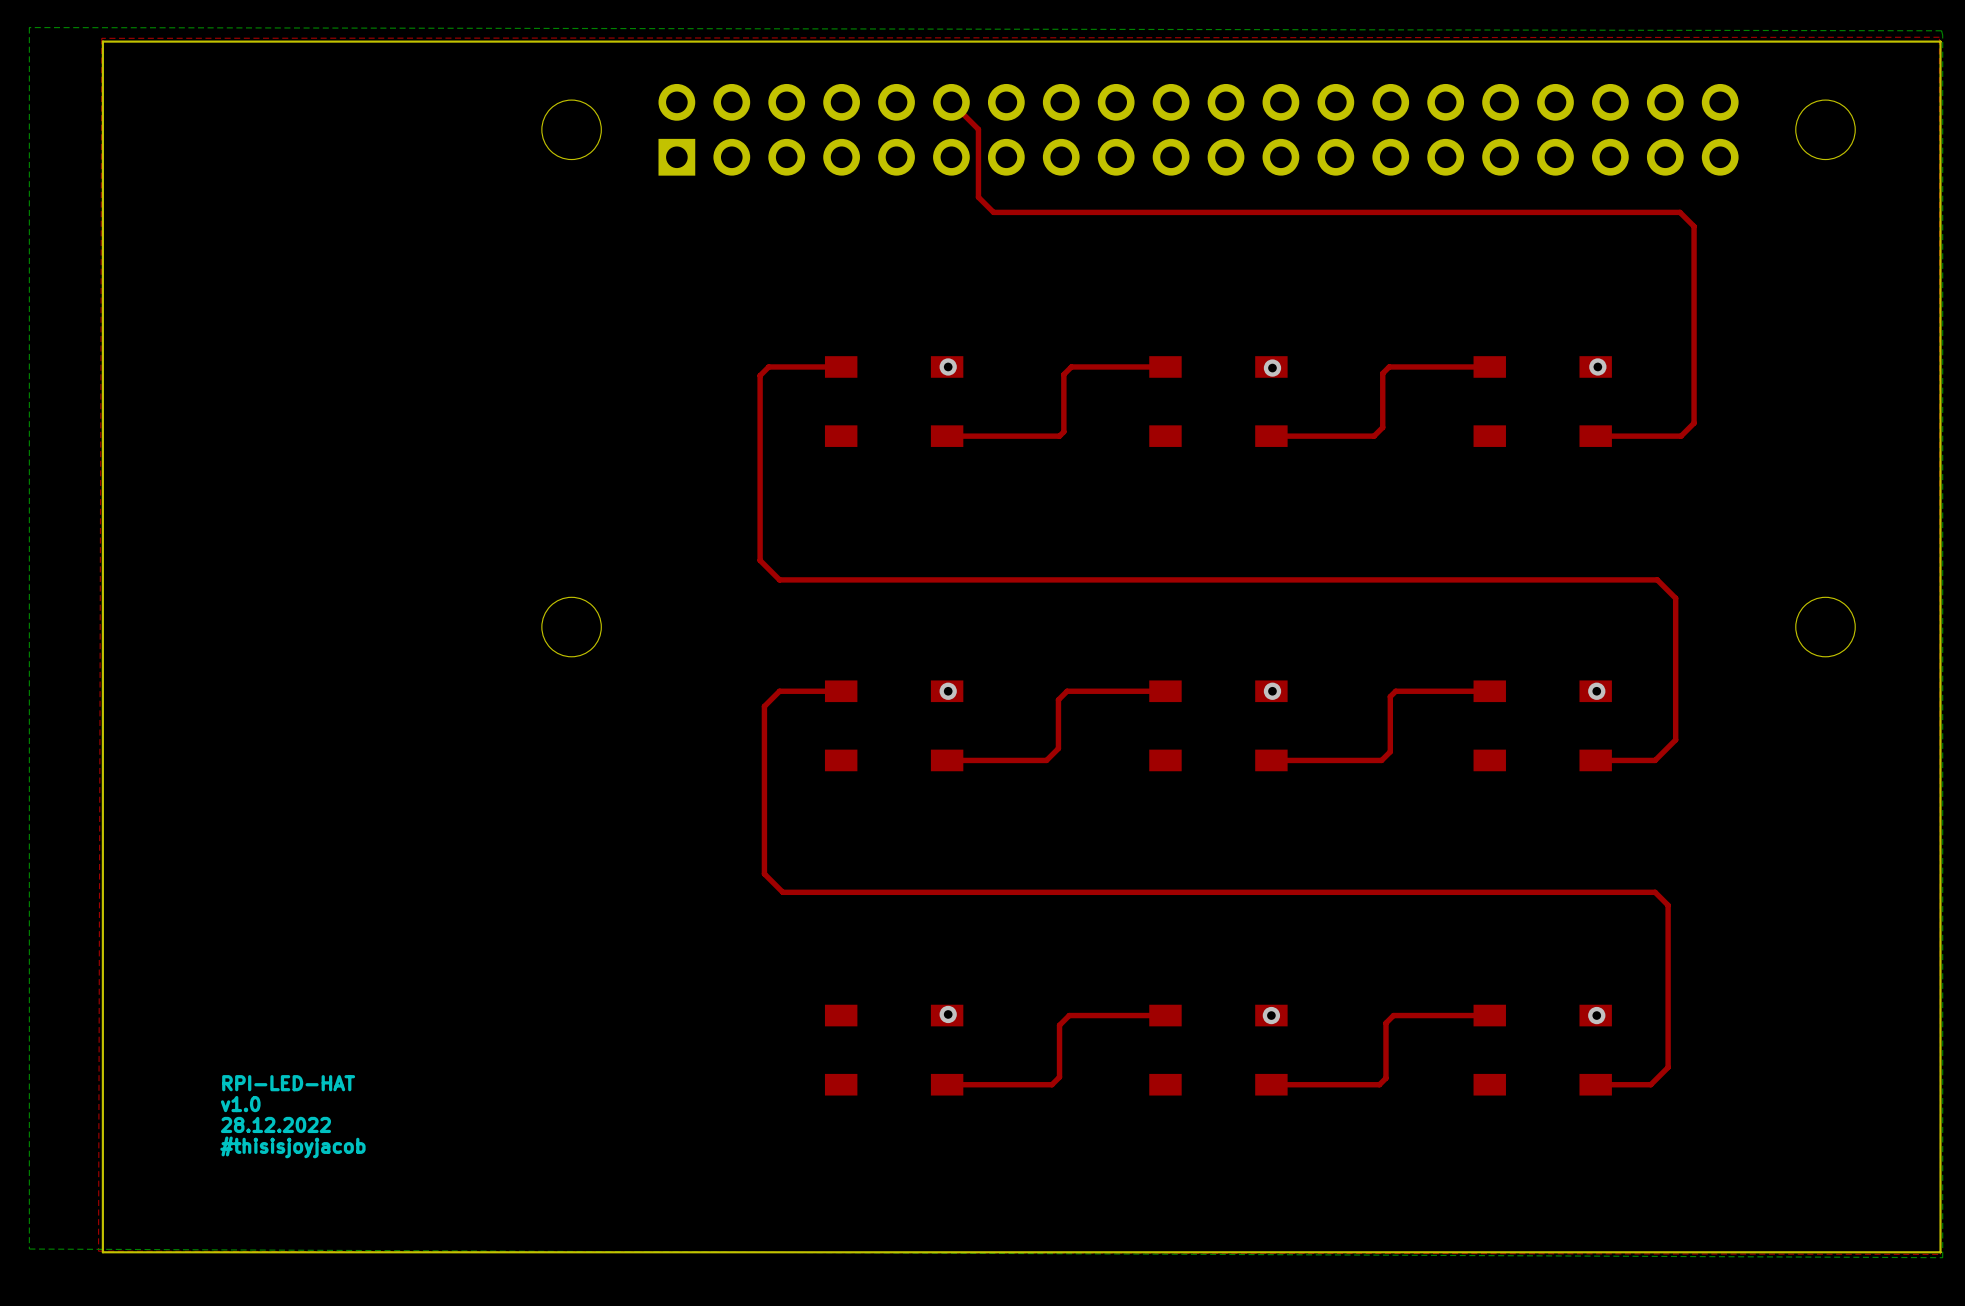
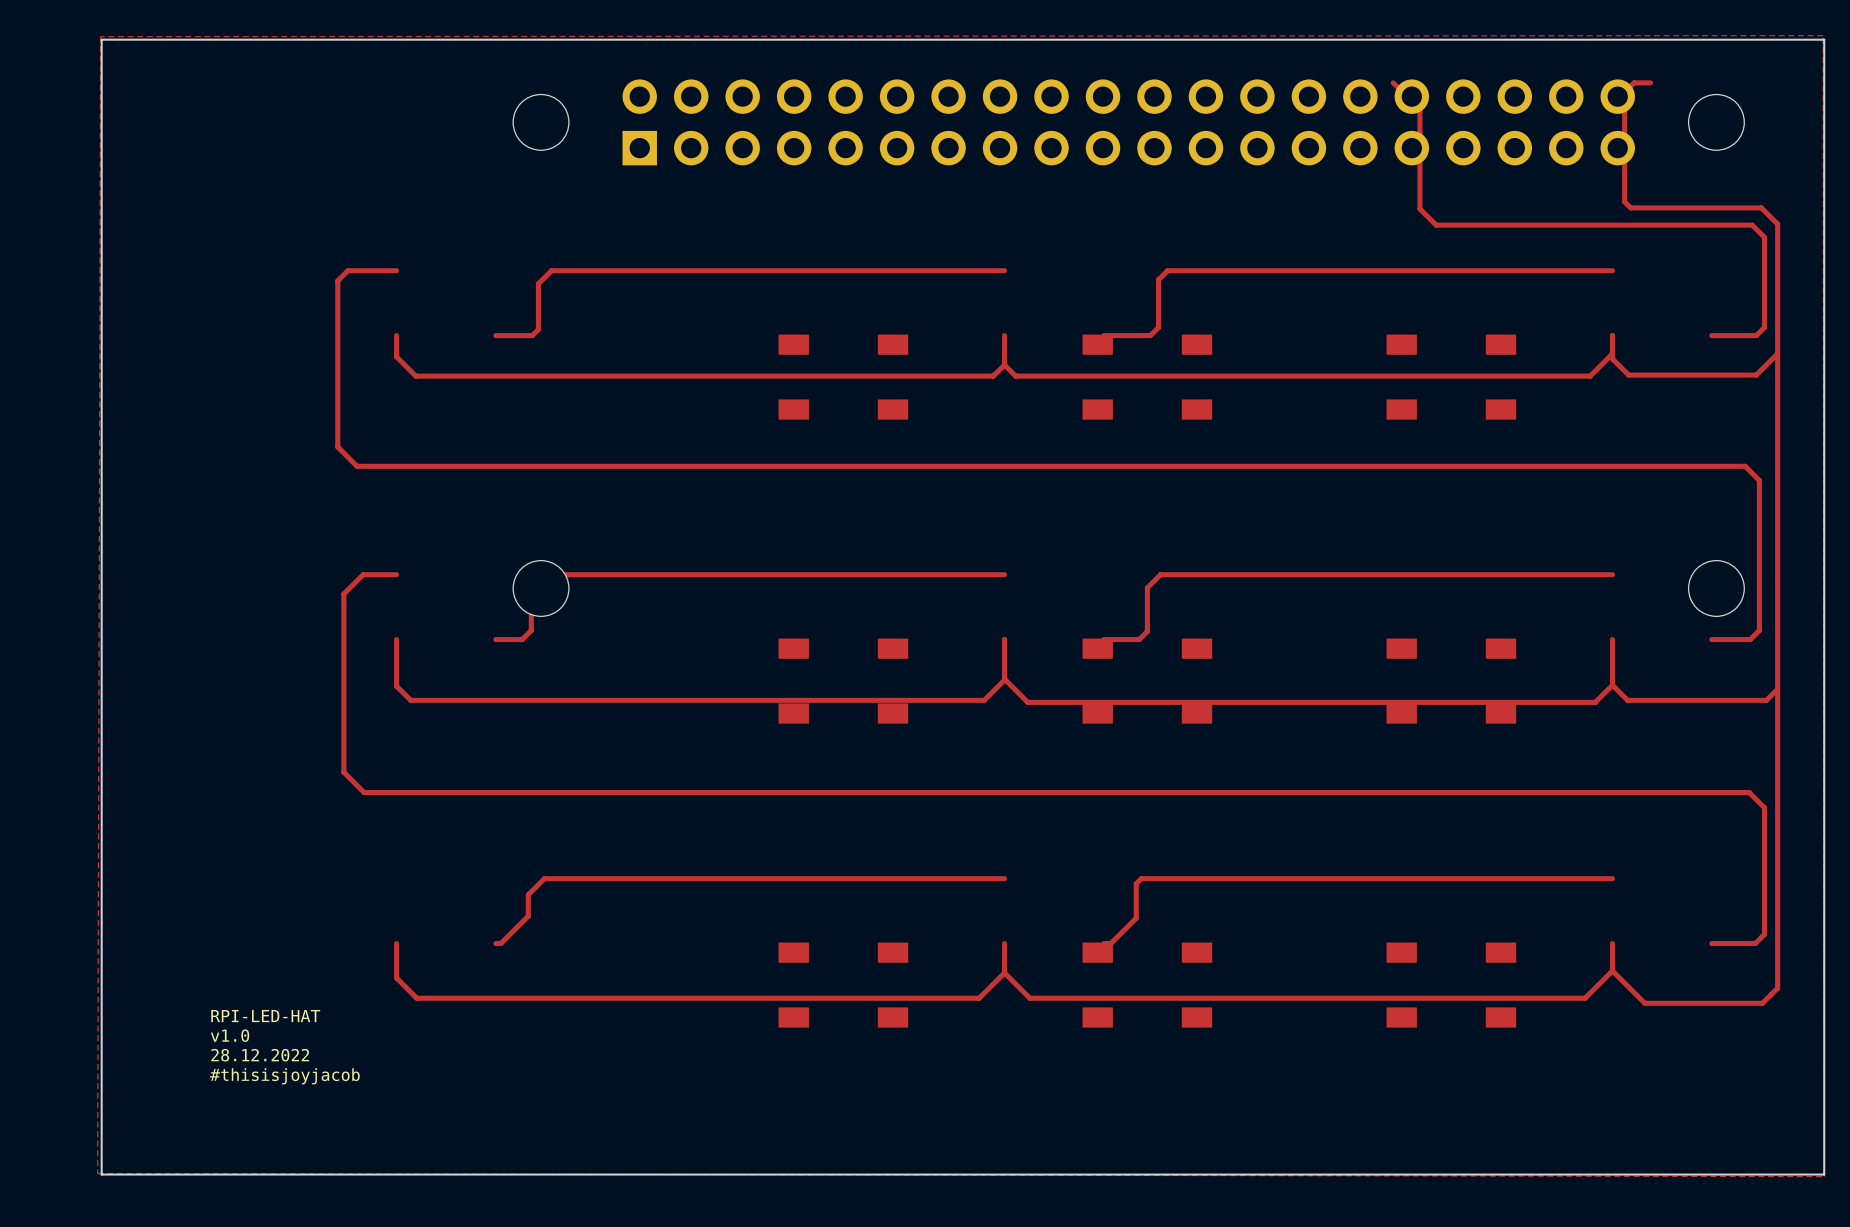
bottom zone outline: (29, 27) (1941, 30) (1942, 1257) (29, 1249) (29, 27) -> none
top track: none -> (1393, 82) (1419, 109) (1419, 208) (1436, 225) (1752, 225) (1764, 237) (1764, 327) (1756, 335) (1711, 335)
top track: none -> (1650, 82) (1634, 82) (1624, 92) (1624, 201) (1630, 207) (1761, 207) (1777, 224) (1777, 988) (1762, 1003) (1644, 1003) (1612, 970)
top track: (951, 102) (978, 129) (978, 197) (993, 212) (1680, 212) (1694, 226) (1694, 423) (1681, 436) (1595, 436) -> none
top track: none -> (396, 270) (347, 270) (337, 280) (337, 447) (357, 466) (1745, 466) (1759, 480) (1759, 630) (1750, 639) (1711, 639)
top track: none -> (1004, 270) (551, 270) (538, 283) (538, 329) (532, 335) (495, 335)
top track: none -> (1612, 270) (1167, 270) (1158, 279) (1158, 327) (1150, 335) (1103, 335)
top track: none -> (396, 335) (396, 356) (415, 376) (993, 376) (1004, 364)
top track: none -> (1004, 335) (1004, 364)
top track: none -> (1612, 335) (1612, 358) (1628, 375) (1756, 375) (1777, 353)
top track: (841, 366) (768, 366) (760, 375) (760, 560) (779, 579) (1657, 579) (1675, 598) (1675, 739) (1655, 760) (1595, 760) -> none
via: (948, 366) -> none
top track: (1165, 366) (1071, 366) (1063, 374) (1063, 431) (1059, 436) (947, 436) -> none
top track: (1489, 366) (1389, 366) (1382, 373) (1382, 427) (1374, 436) (1271, 436) -> none
via: (1597, 366) -> none
via: (1272, 368) -> none
top track: none -> (1612, 353) (1590, 376) (1015, 376) (1004, 364)
top track: none -> (396, 574) (363, 574) (343, 593) (343, 772) (364, 792) (1749, 792) (1764, 807) (1764, 934) (1755, 943) (1711, 943)
top track: none -> (1004, 574) (541, 574) (531, 584) (531, 630) (522, 639) (495, 639)
top track: none -> (1612, 574) (1160, 574) (1147, 587) (1147, 631) (1139, 639) (1103, 639)
top track: none -> (1004, 639) (1004, 680) (984, 700) (410, 700) (396, 686) (396, 639)
top track: none -> (1612, 639) (1612, 685)
top track: (841, 691) (779, 691) (764, 706) (764, 873) (782, 892) (1655, 892) (1668, 905) (1668, 1067) (1650, 1084) (1595, 1084) -> none
via: (948, 691) -> none
top track: (1165, 691) (1067, 691) (1058, 699) (1058, 748) (1046, 760) (947, 760) -> none
via: (1272, 691) -> none
top track: (1489, 691) (1395, 691) (1390, 696) (1390, 751) (1381, 760) (1271, 760) -> none
via: (1596, 691) -> none
top track: none -> (1004, 679) (1027, 702) (1595, 702) (1612, 685)
top track: none -> (1612, 685) (1627, 700) (1766, 700) (1777, 691)
top track: none -> (1004, 878) (544, 878) (528, 894) (528, 916) (500, 943) (495, 943)
top track: none -> (1612, 878) (1141, 878) (1136, 883) (1136, 918) (1110, 943) (1103, 943)
top track: none -> (396, 943) (396, 977) (416, 998) (979, 998) (1004, 972)
top track: none -> (1004, 943) (1004, 972)
top track: none -> (1612, 943) (1612, 970)
via: (948, 1014) -> none
top track: (1165, 1015) (1069, 1015) (1059, 1025) (1059, 1077) (1051, 1084) (947, 1084) -> none
via: (1271, 1015) -> none
top track: (1489, 1015) (1393, 1015) (1385, 1023) (1385, 1078) (1379, 1084) (1271, 1084) -> none
via: (1596, 1015) -> none
top track: none -> (1612, 970) (1585, 998) (1029, 998) (1004, 972)

